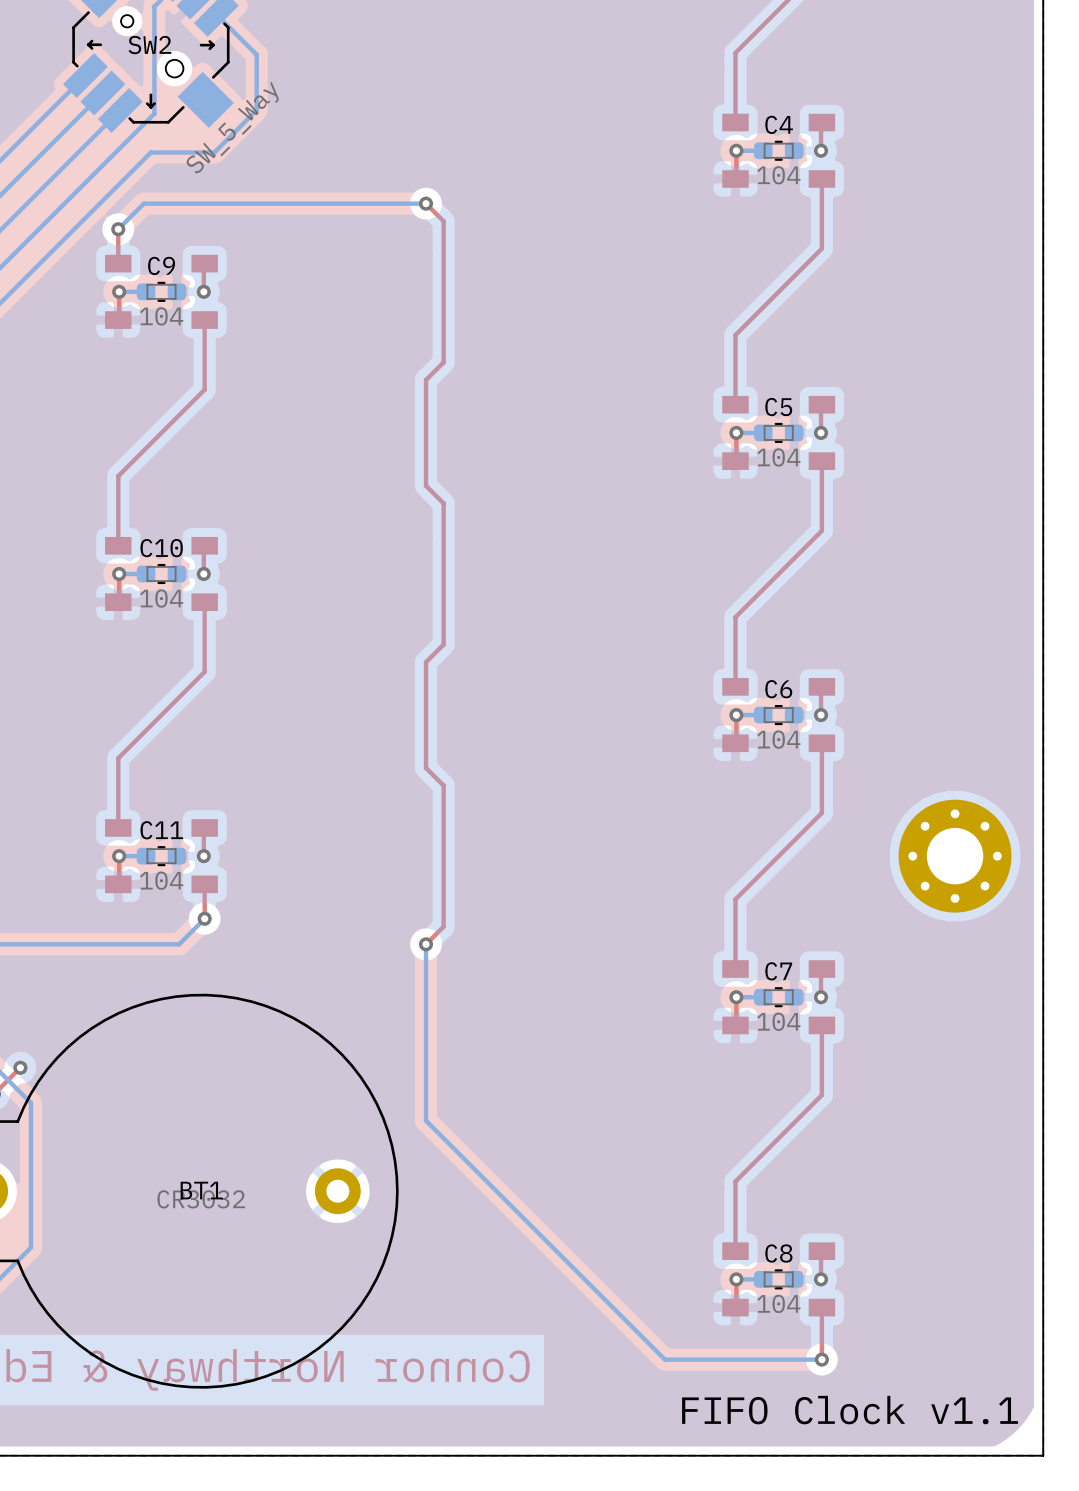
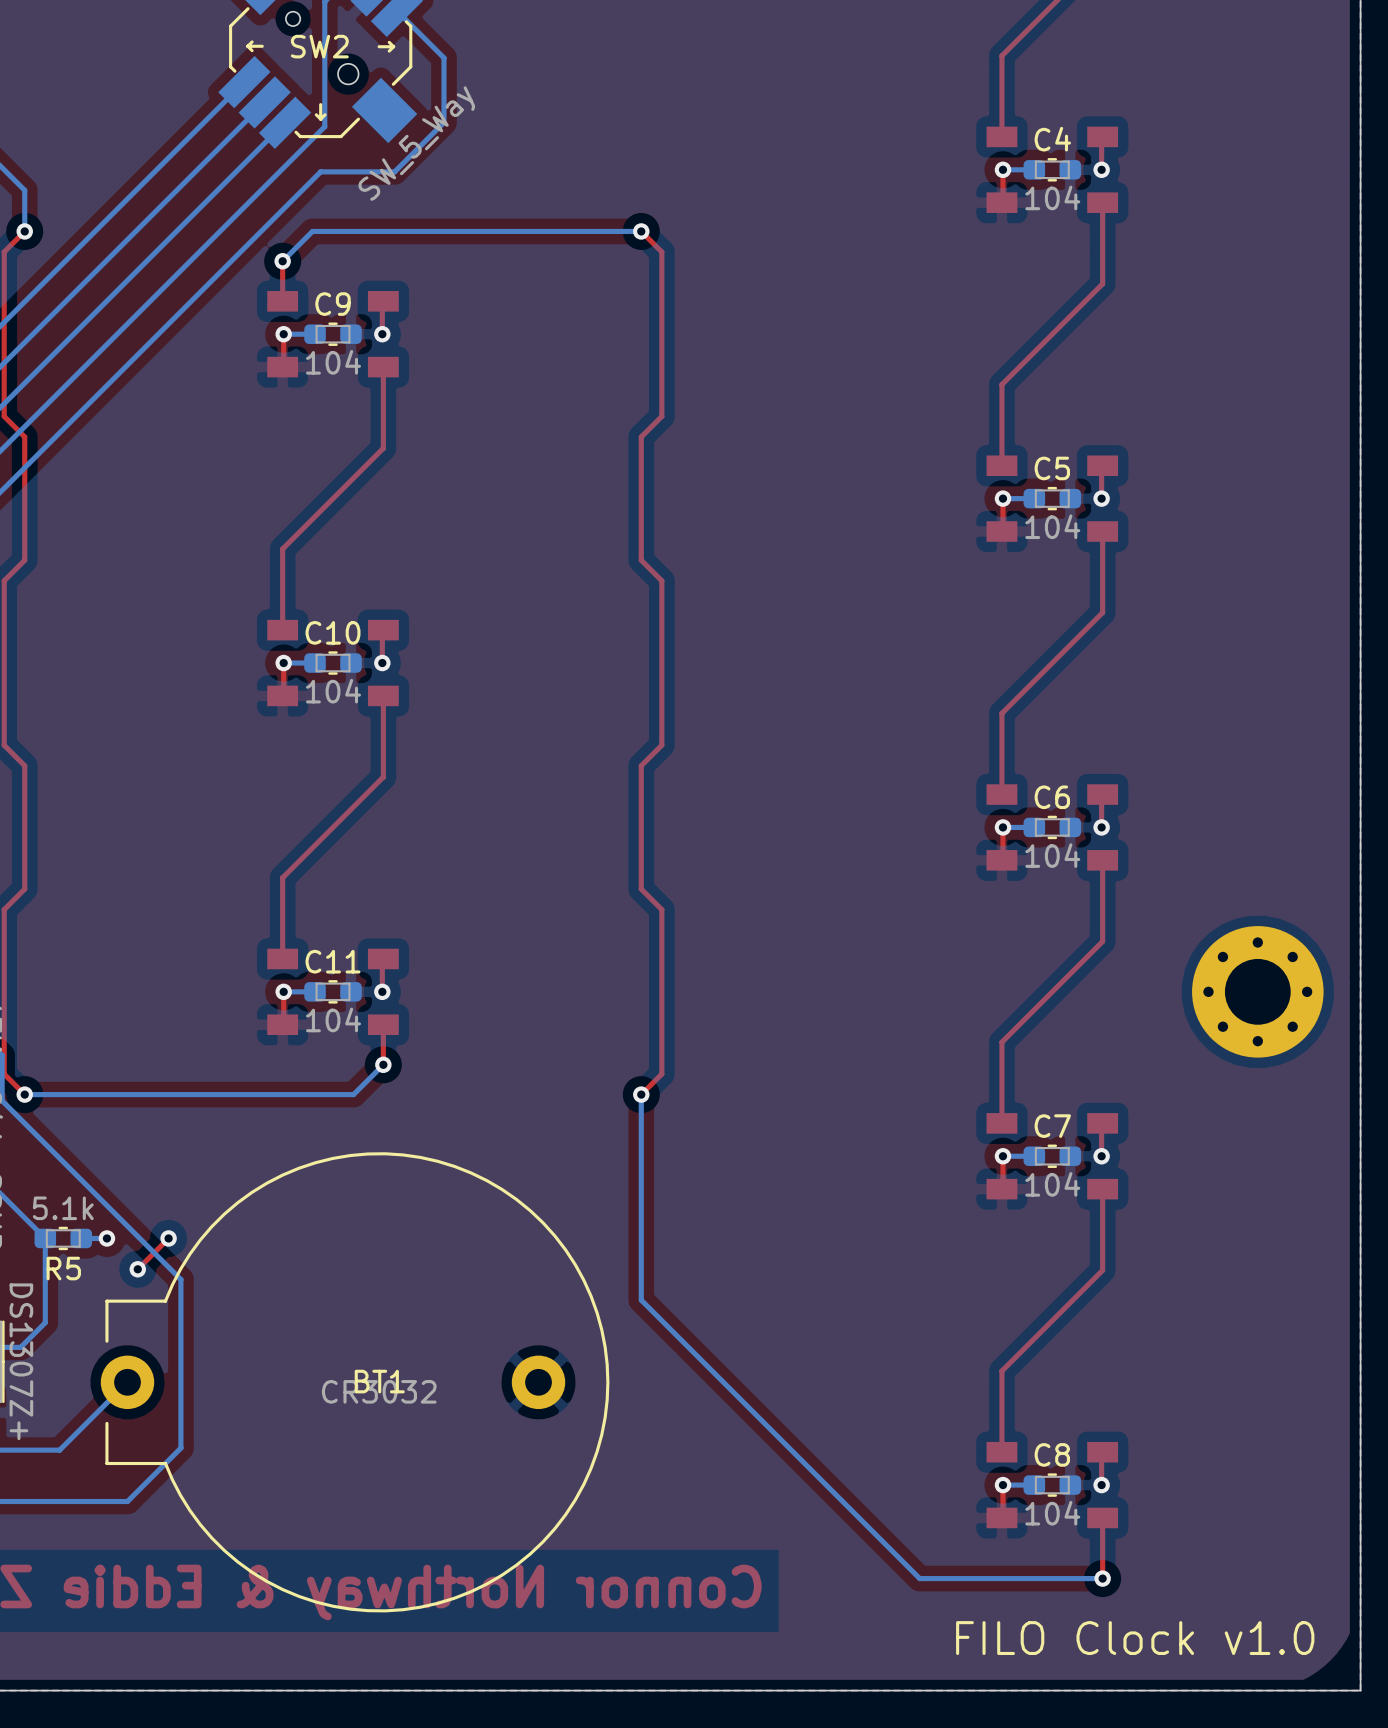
text: FIFO Clock v1.1 (850, 1410) -> FILO Clock v1.0 (1135, 1638)

